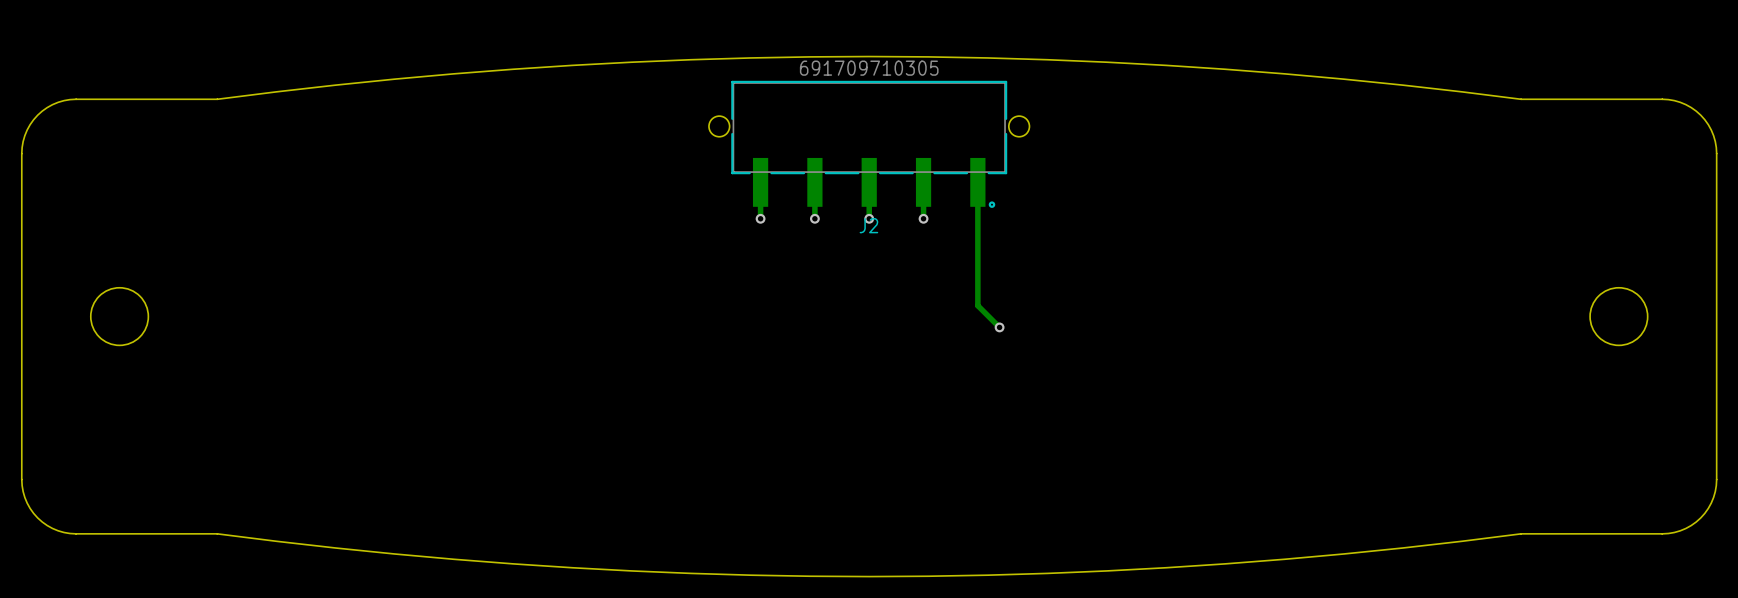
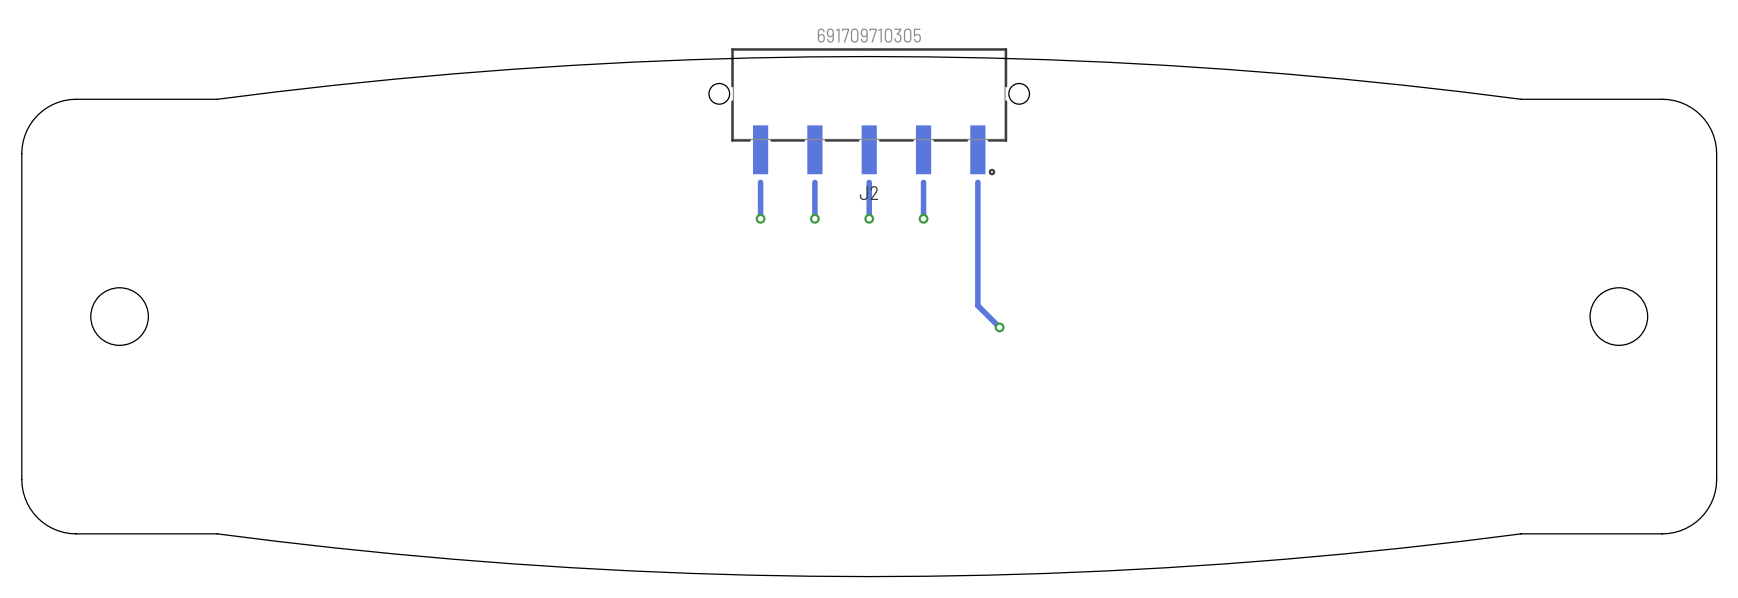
J2 position: (869, 144) -> (869, 111)

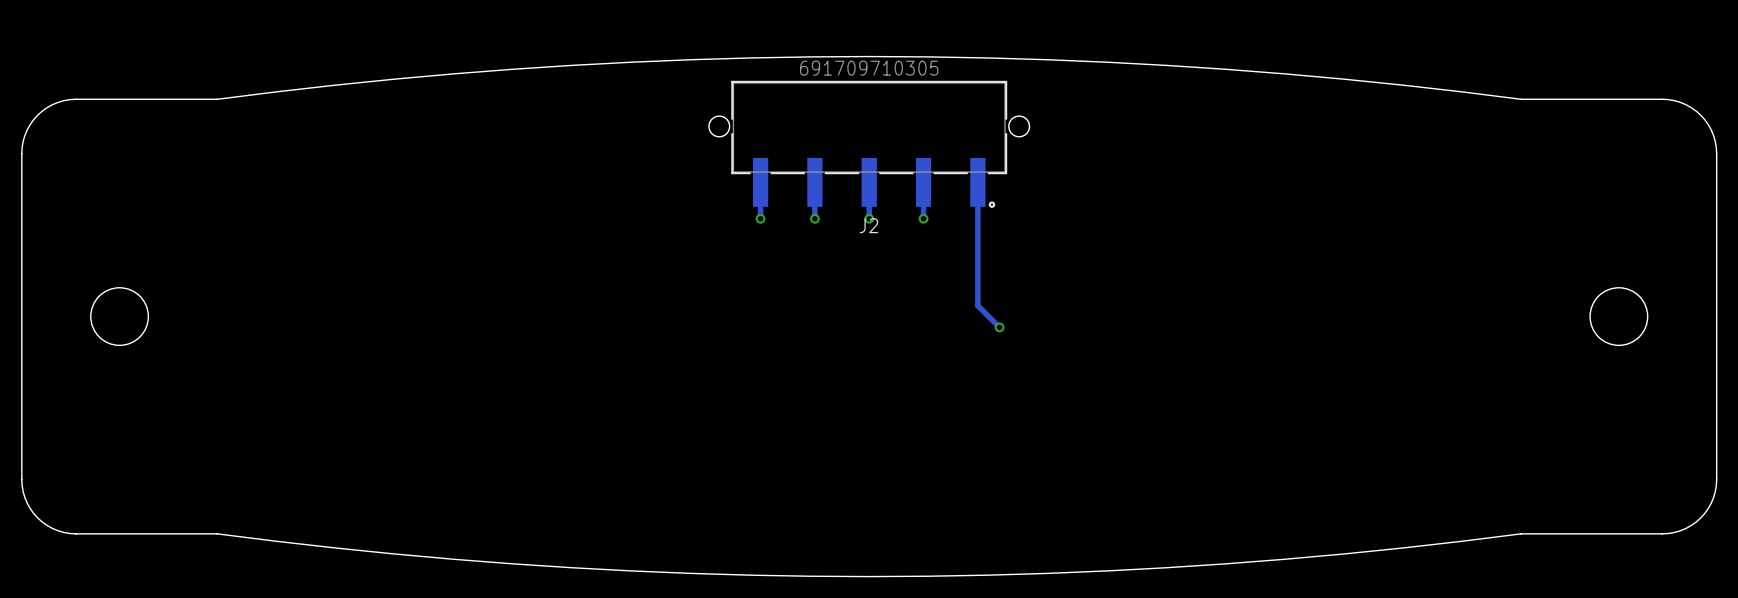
J2 position: (869, 111) -> (869, 144)

